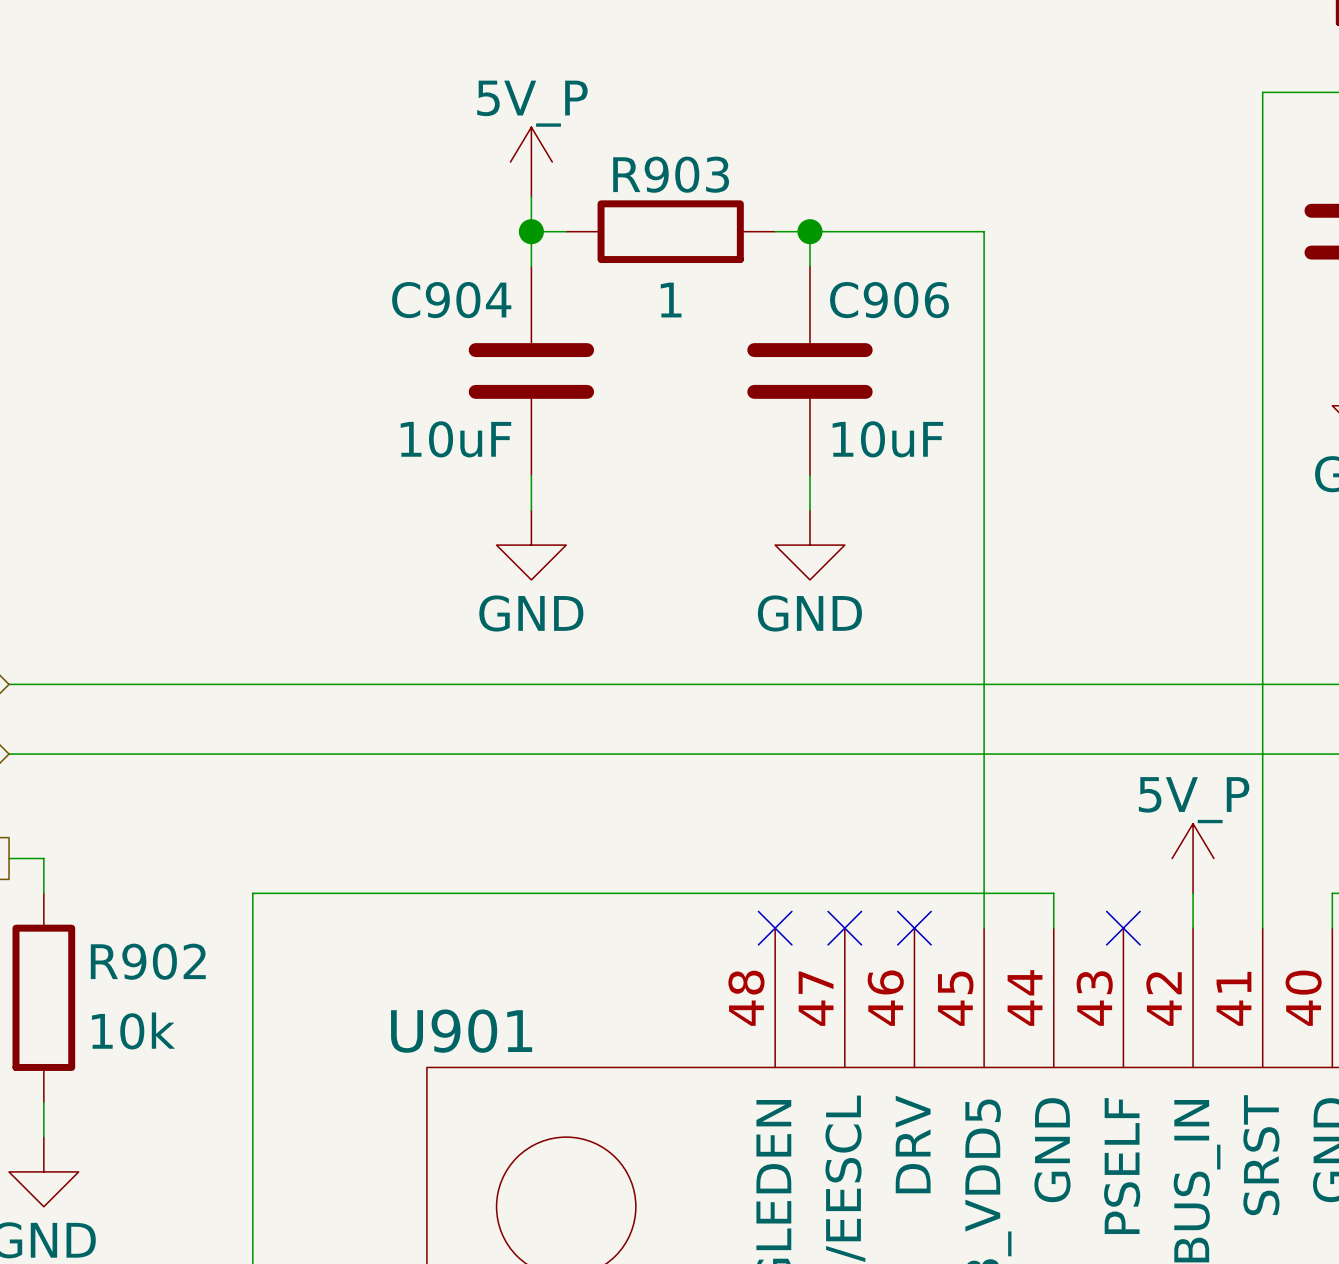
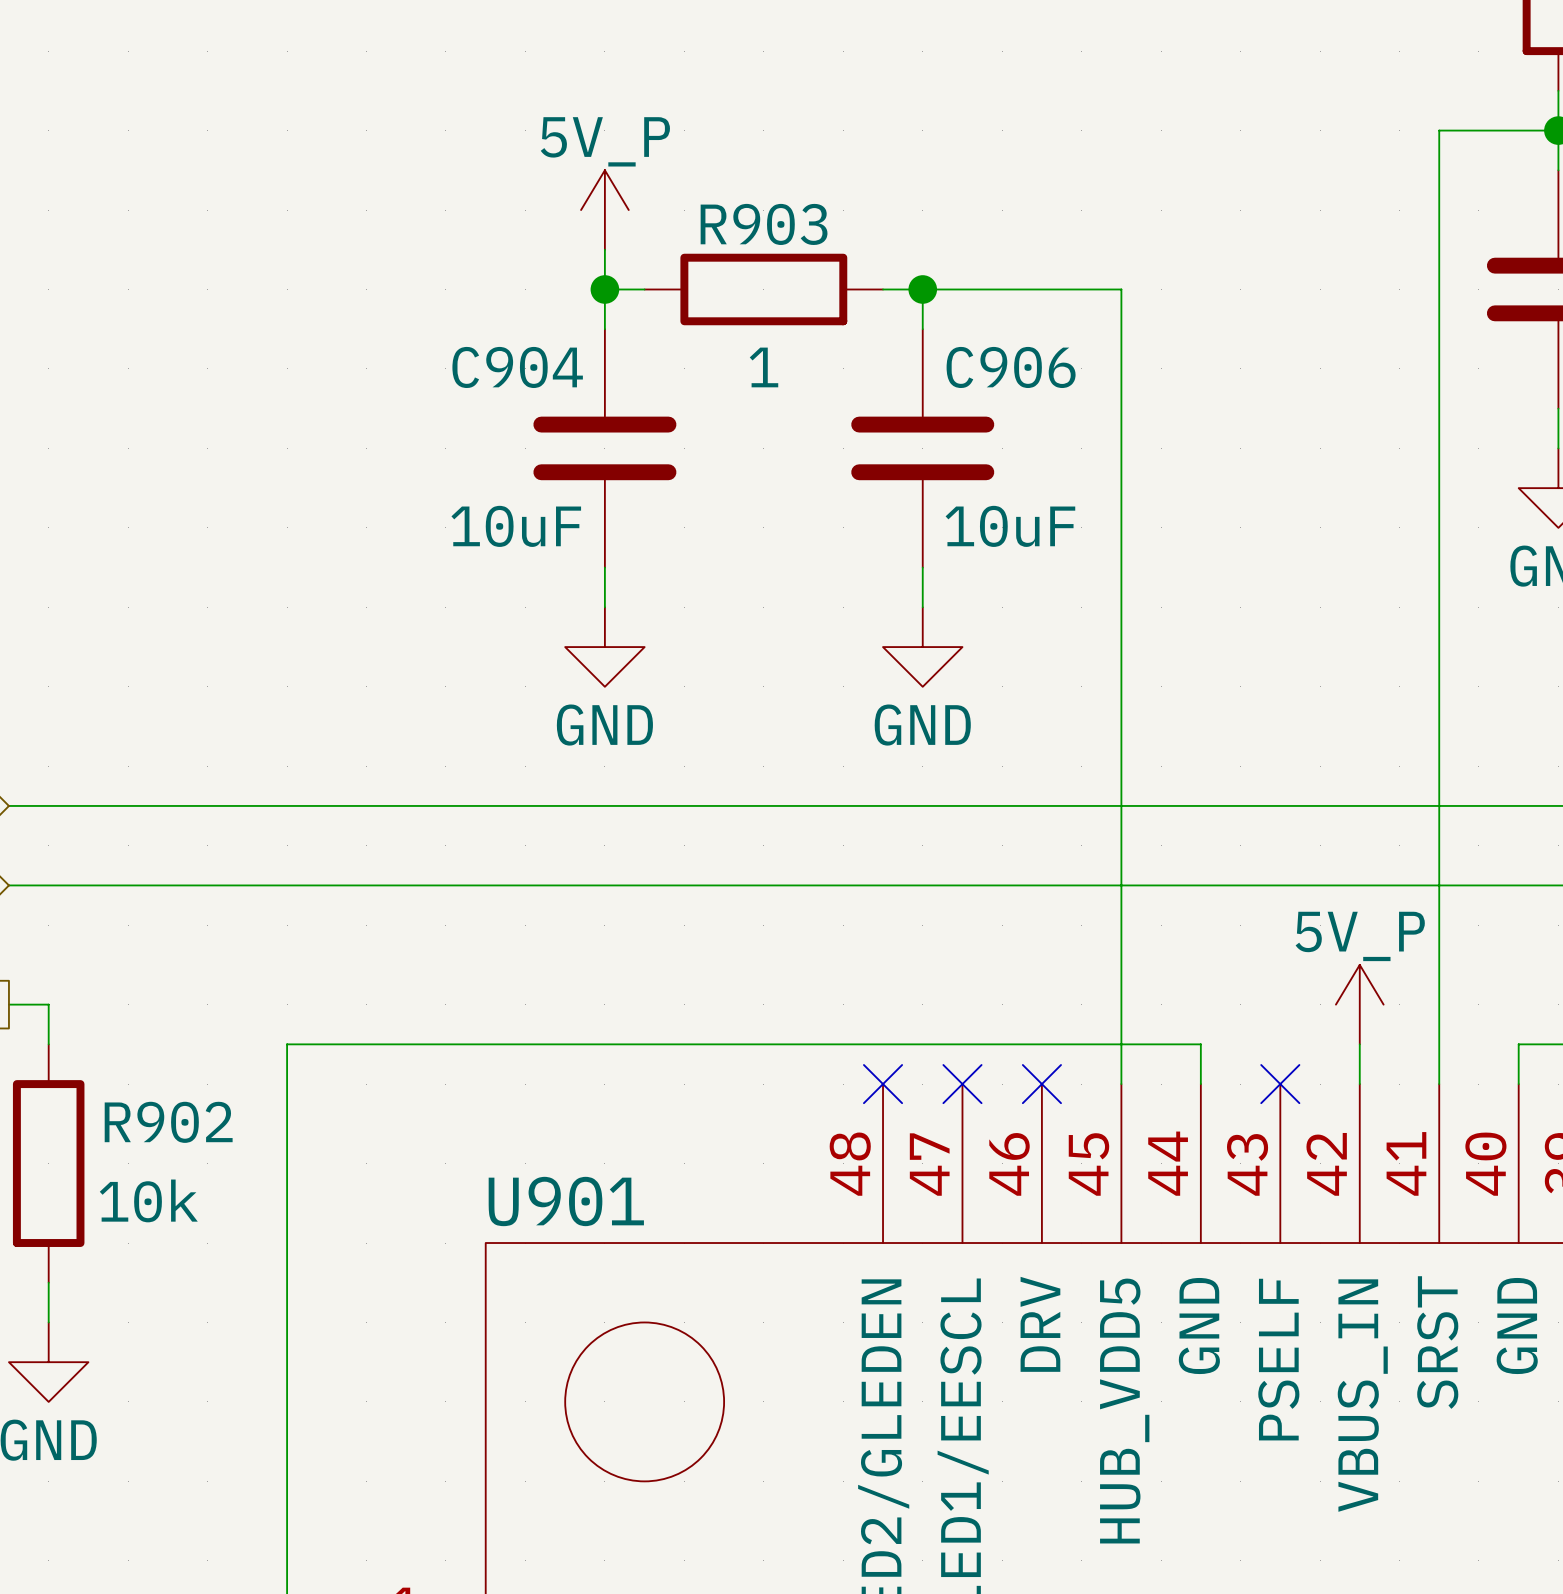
U901 name position: U901 (461, 1031) -> U901 (566, 1201)

